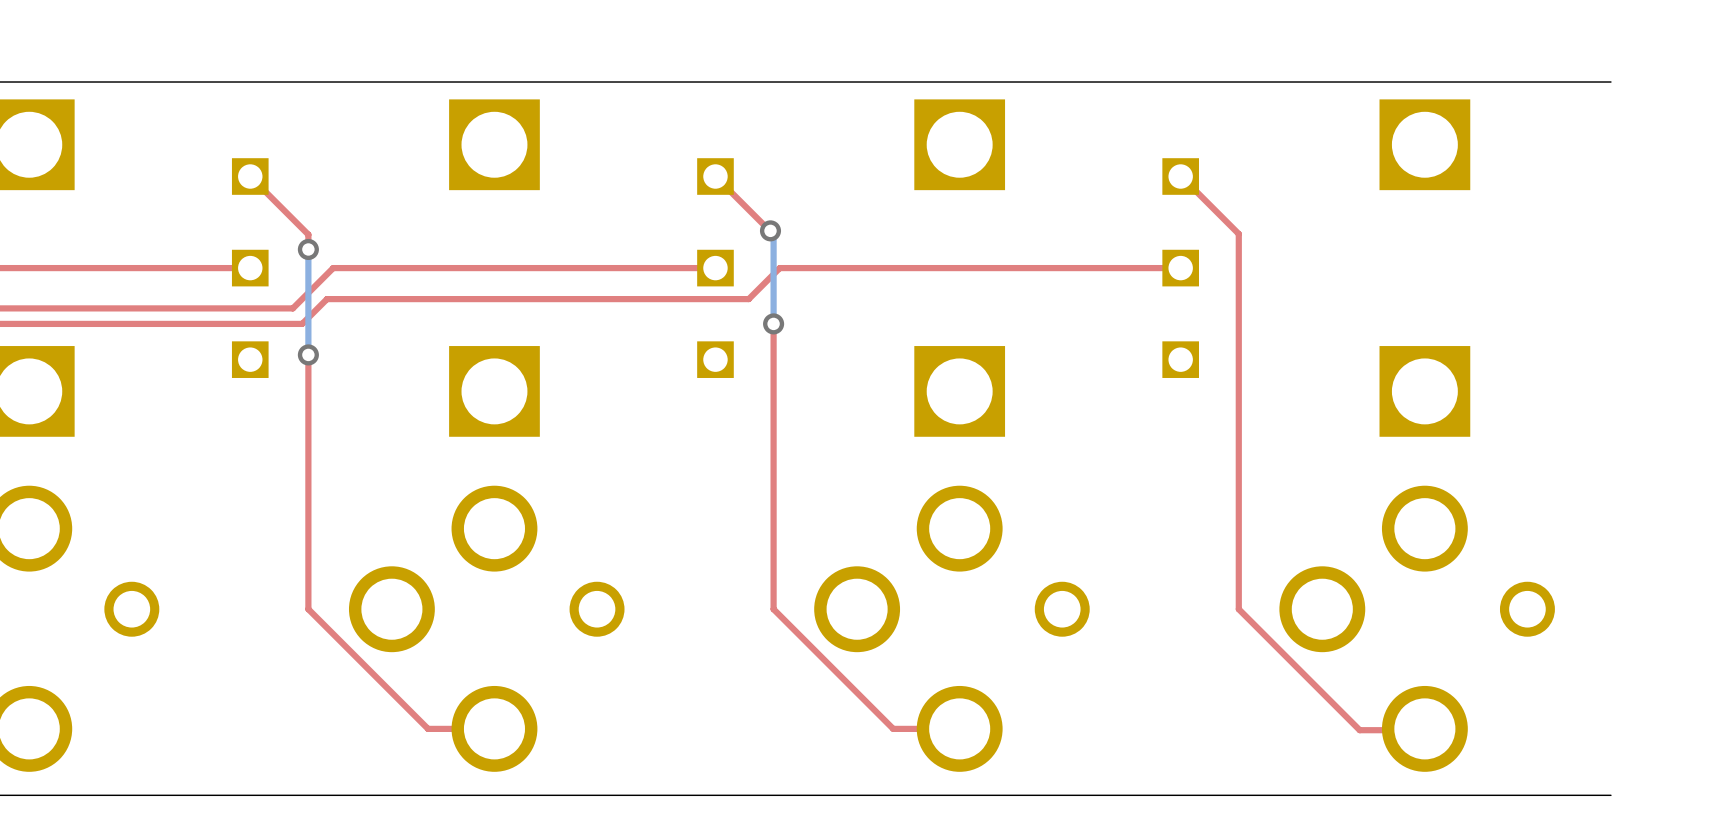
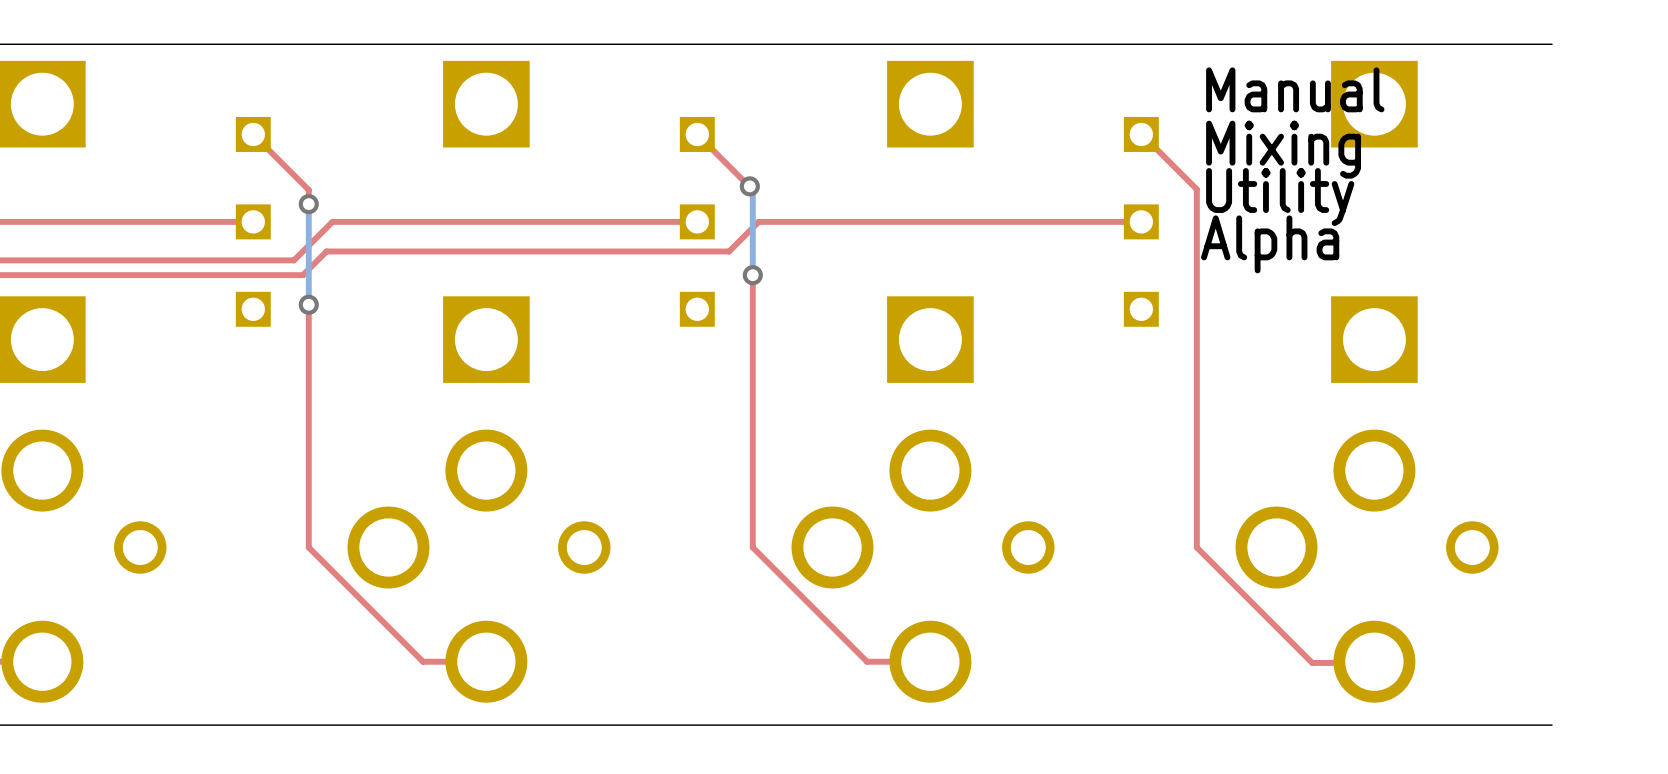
text: none -> Manual (1295, 89)
text: none -> Mixing (1283, 149)
text: none -> Utility (1280, 197)
text: none -> Alpha (1270, 244)

